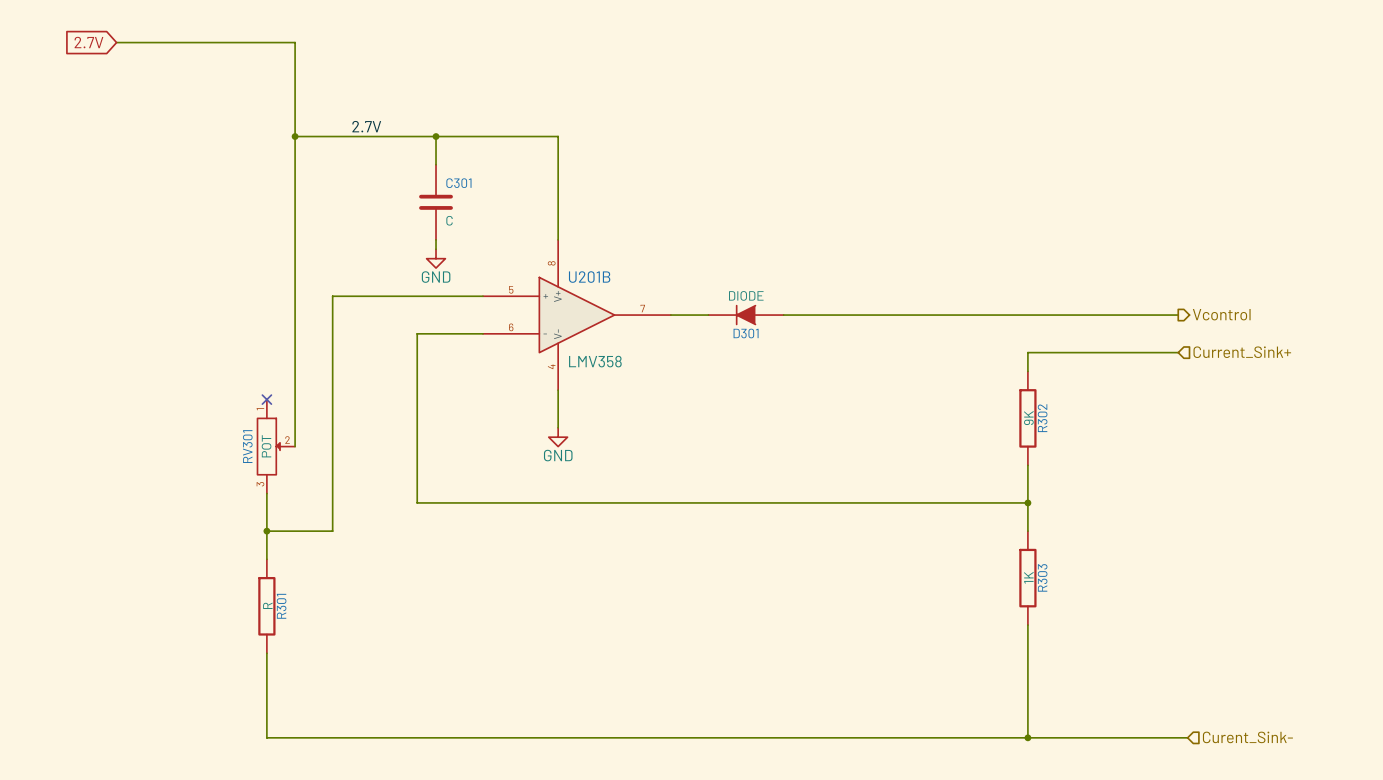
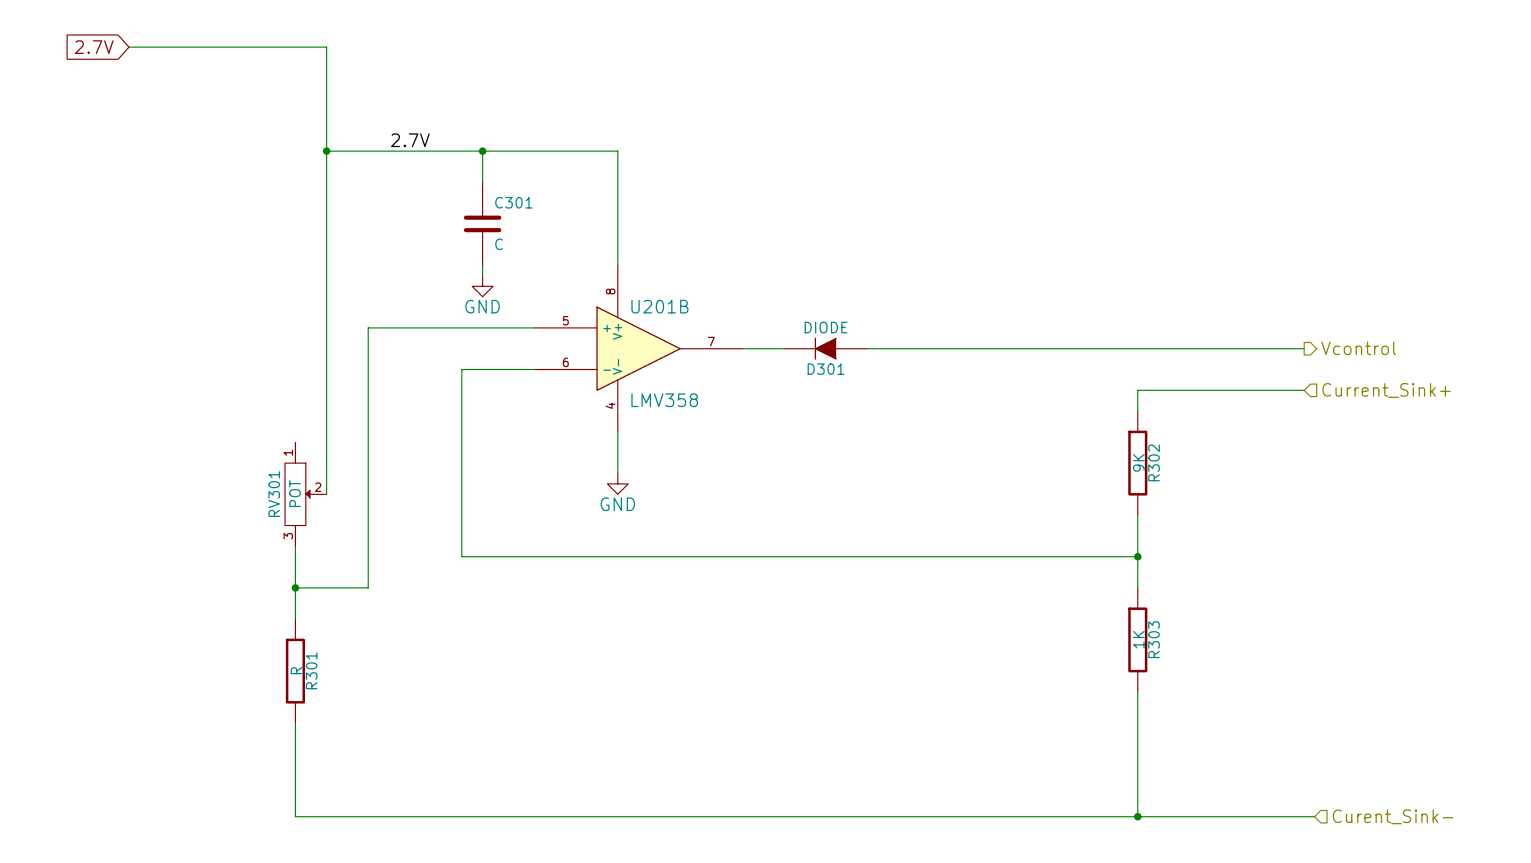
no-connect mark: (266, 399) -> none

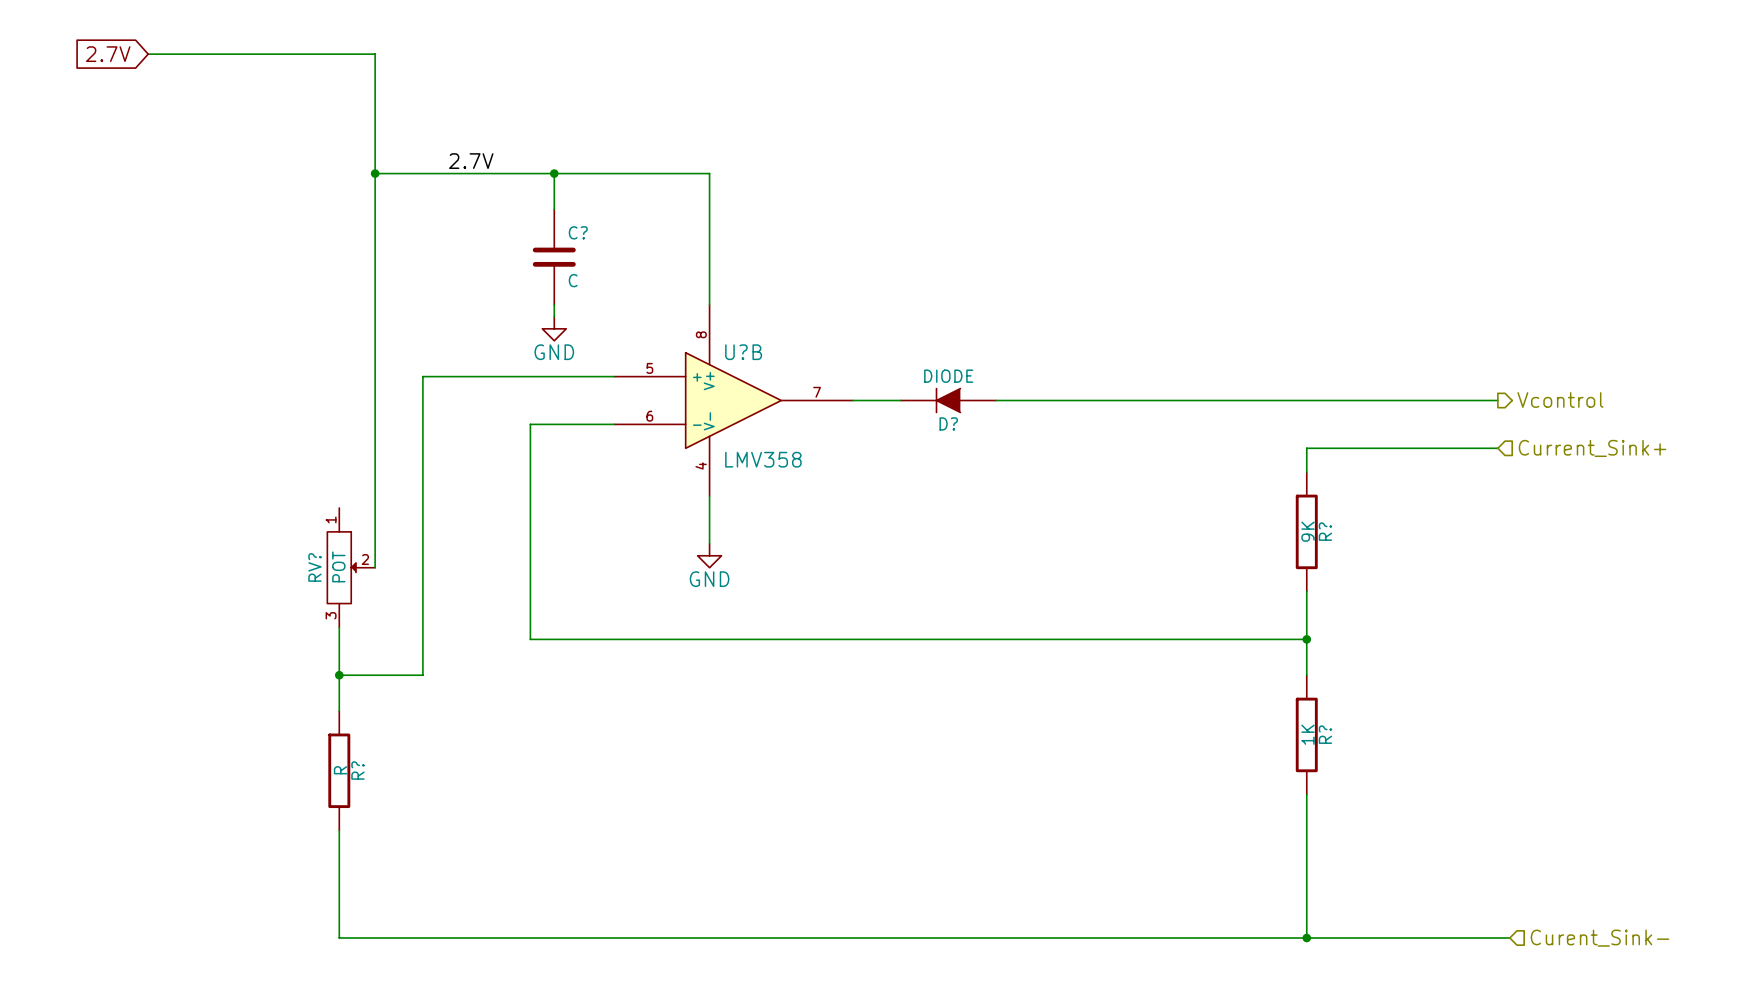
C301 name: C301 (513, 202) -> C? (578, 232)
U201B name: U201B (659, 306) -> U?B (743, 352)
D301 name: D301 (826, 369) -> D? (948, 423)
R302 name: R302 (1154, 462) -> R? (1325, 531)
RV301 name: RV301 (274, 494) -> RV? (314, 567)
R303 name: R303 (1154, 639) -> R? (1325, 734)
R301 name: R301 (311, 670) -> R? (357, 770)

